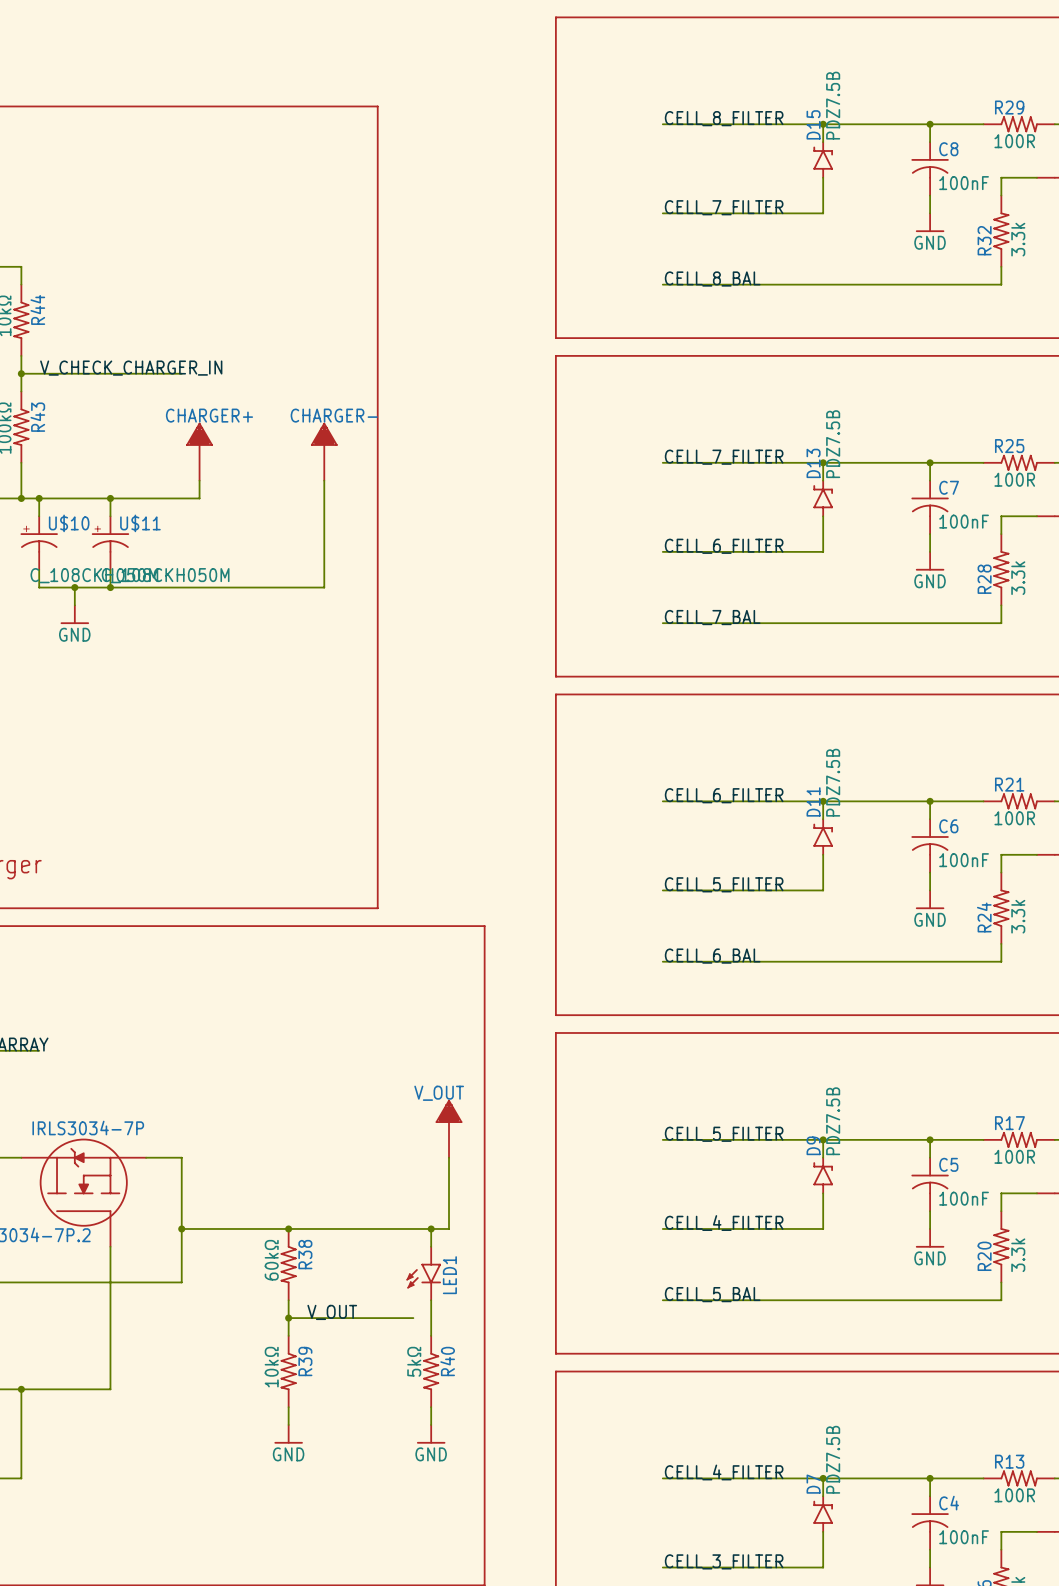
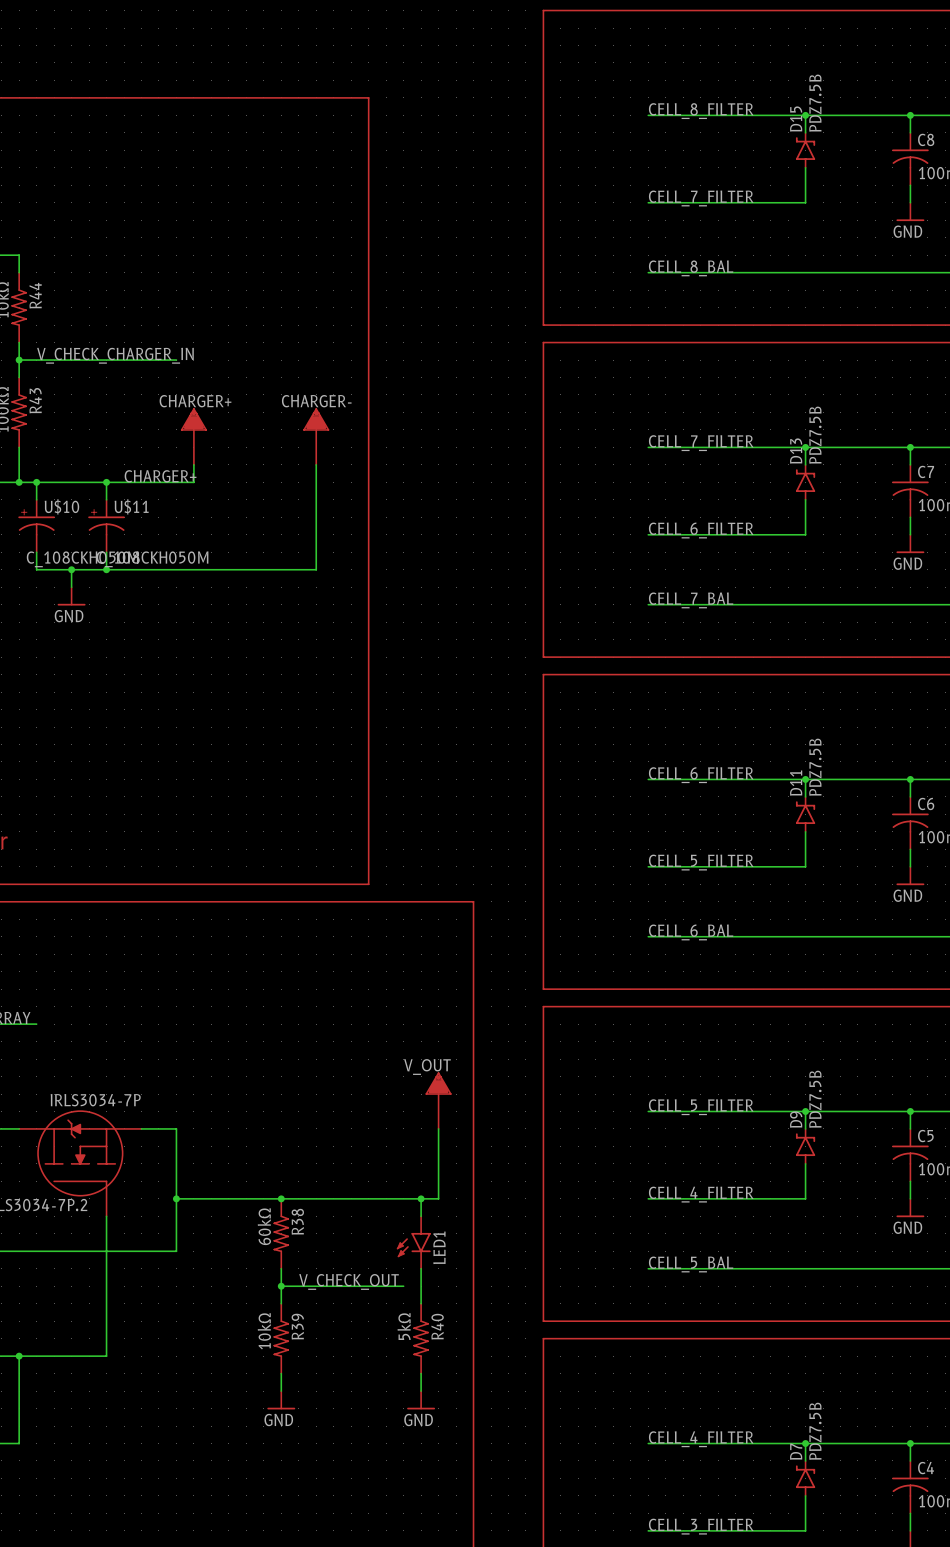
label: none -> CHARGER+ (160, 476)
label: V_OUT (332, 1312) -> V_CHECK_OUT (349, 1281)

